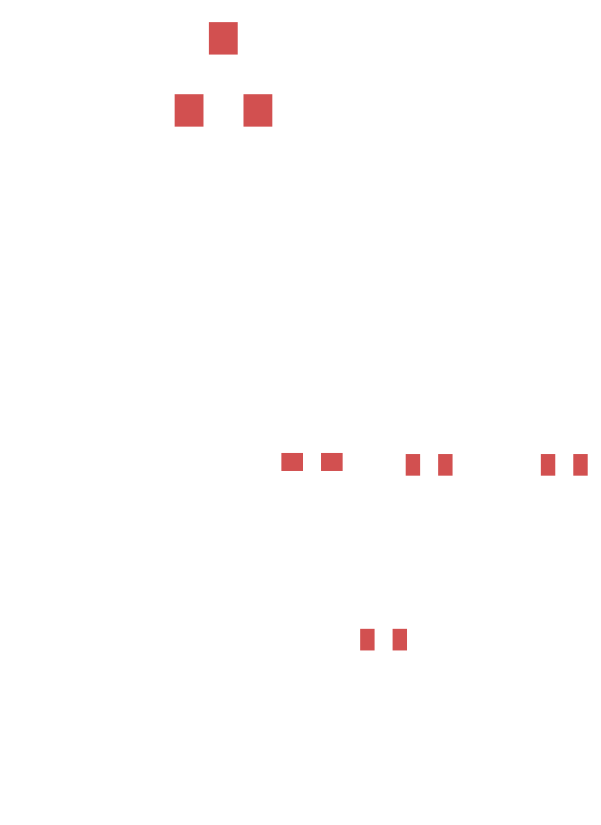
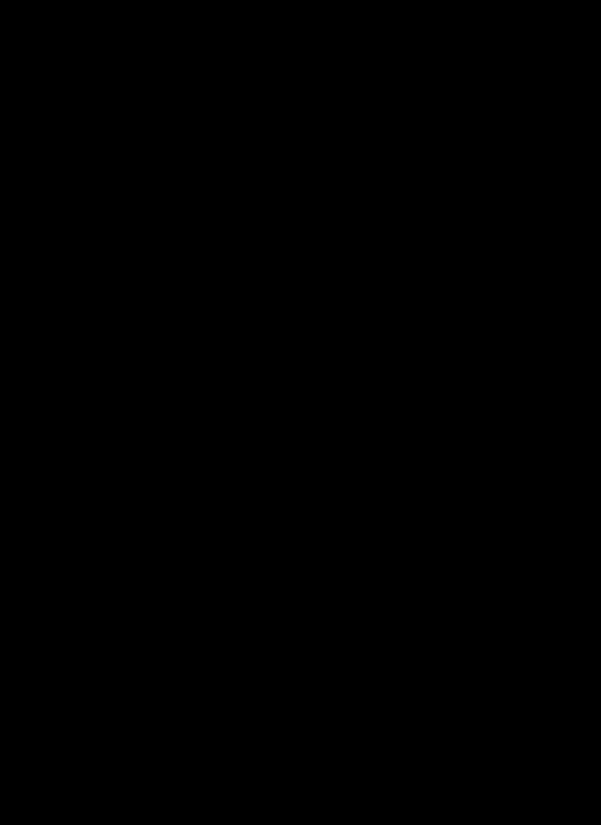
part: (223, 74) -> none
part: (312, 461) -> none
part: (429, 464) -> none
part: (564, 464) -> none
part: (383, 639) -> none

